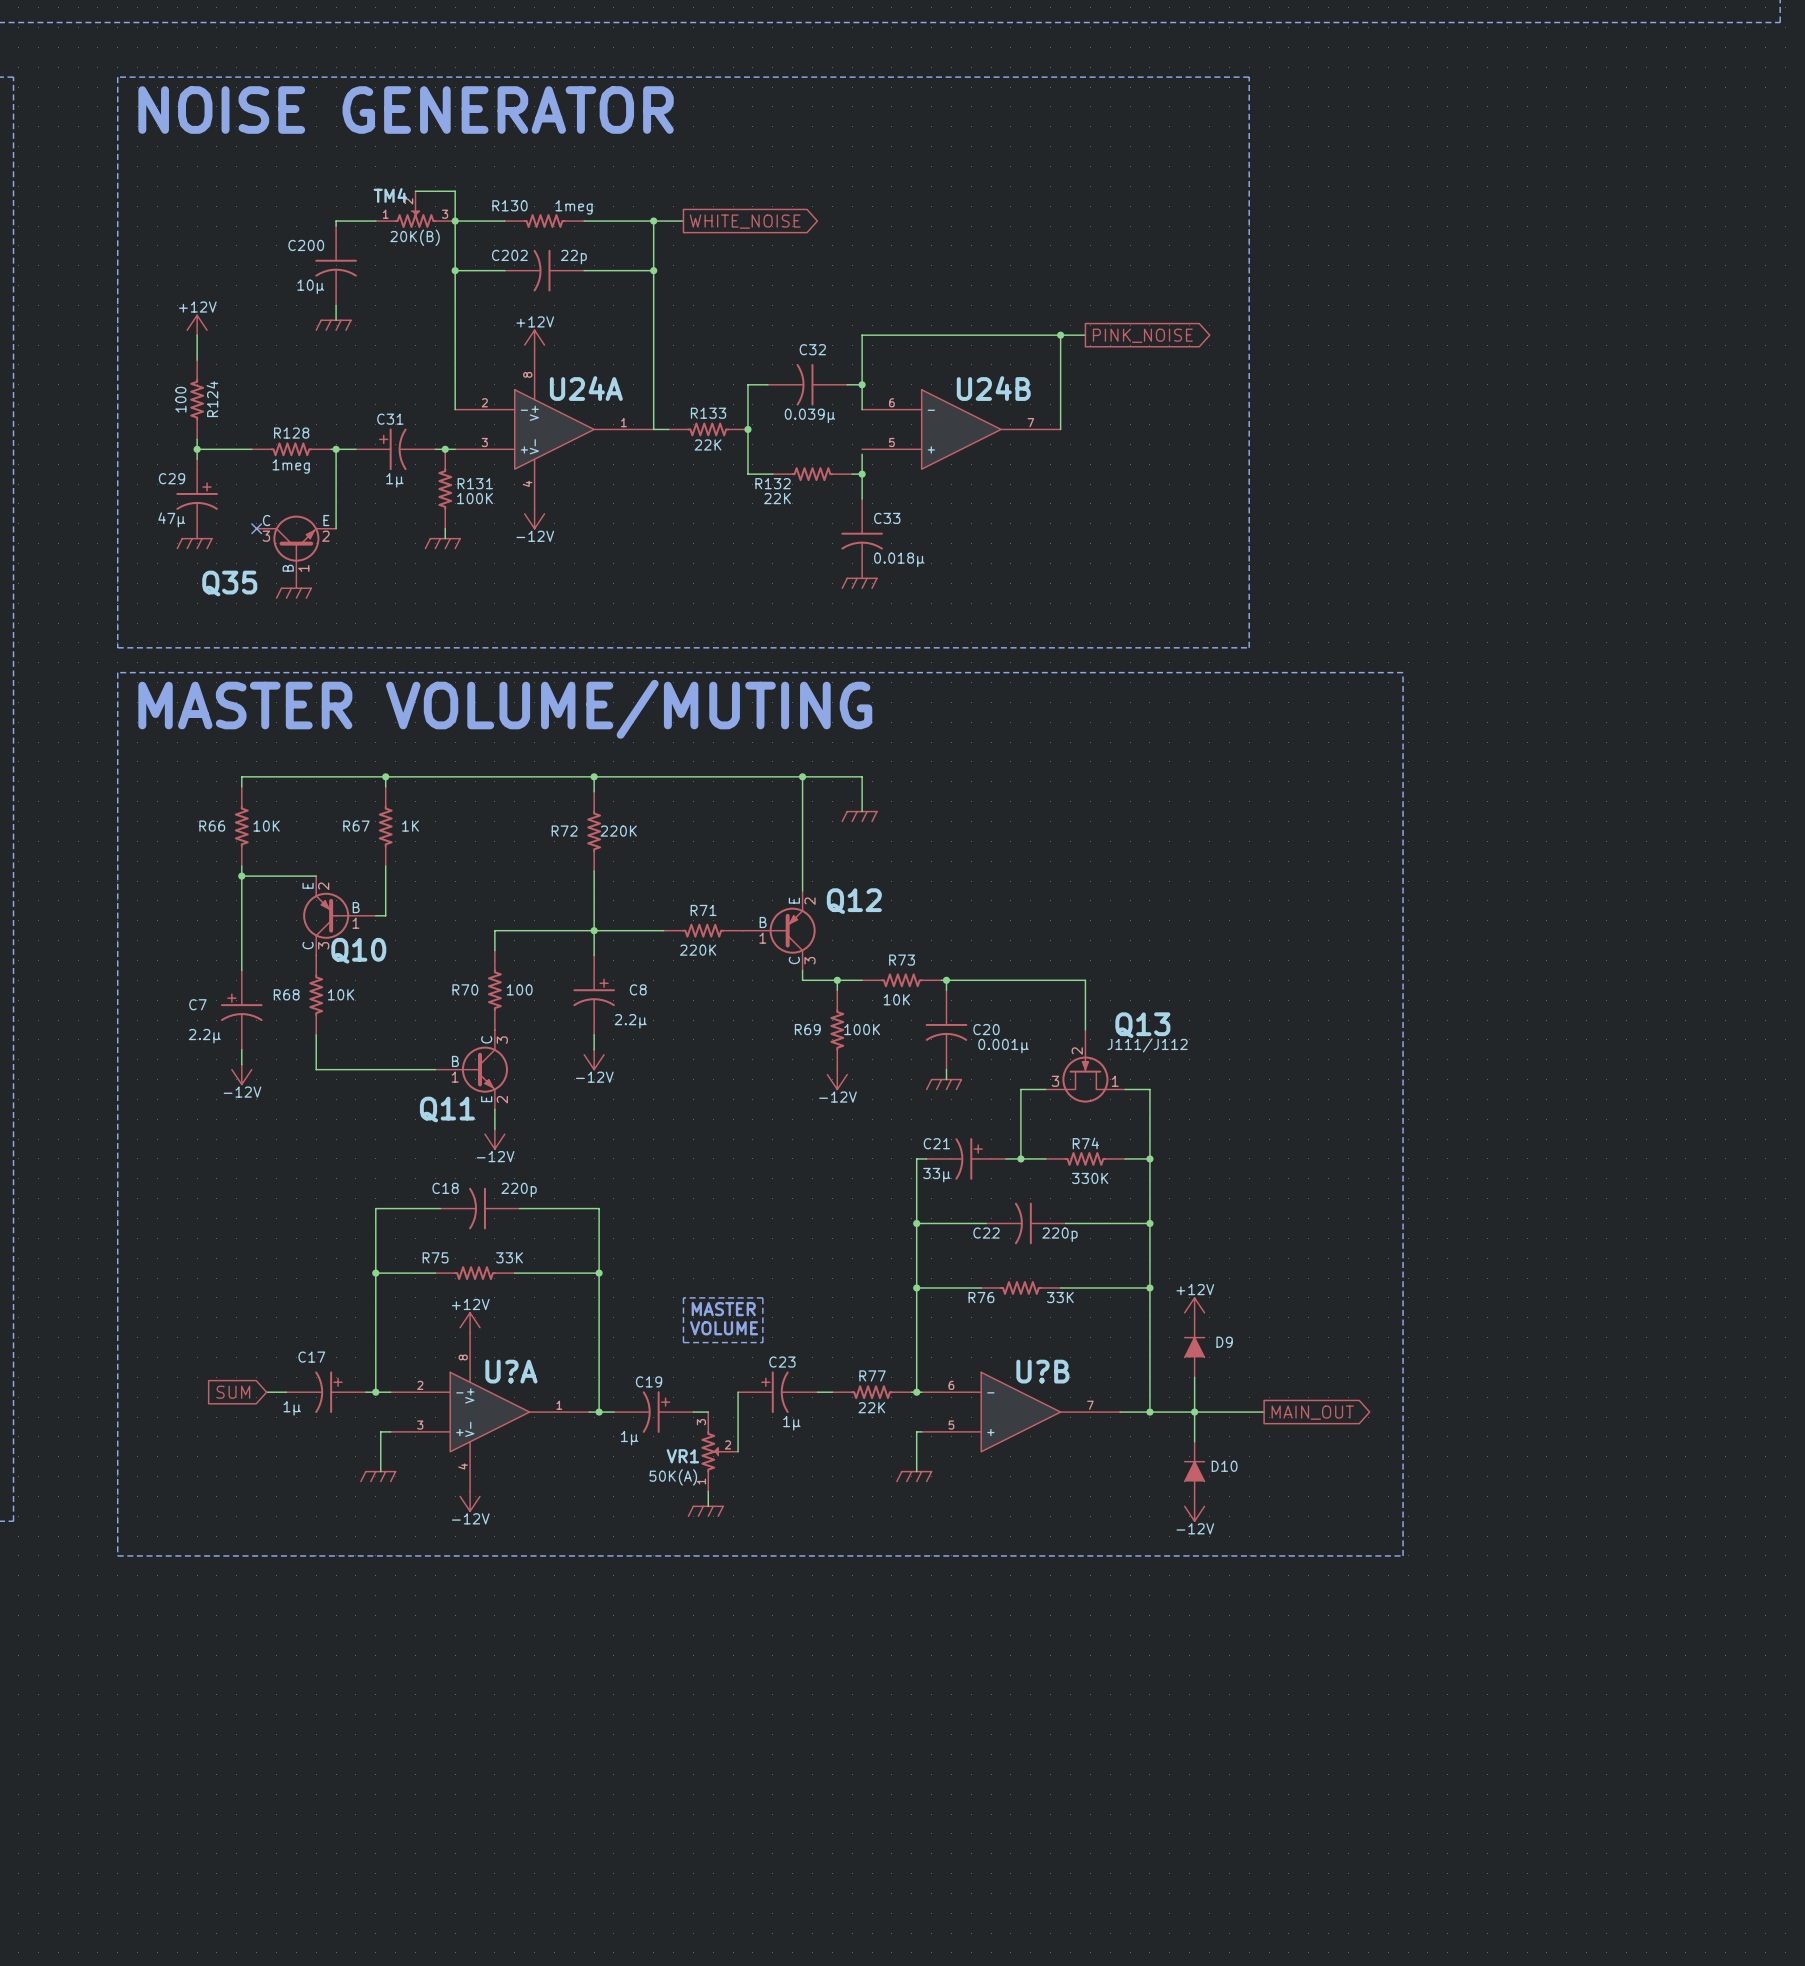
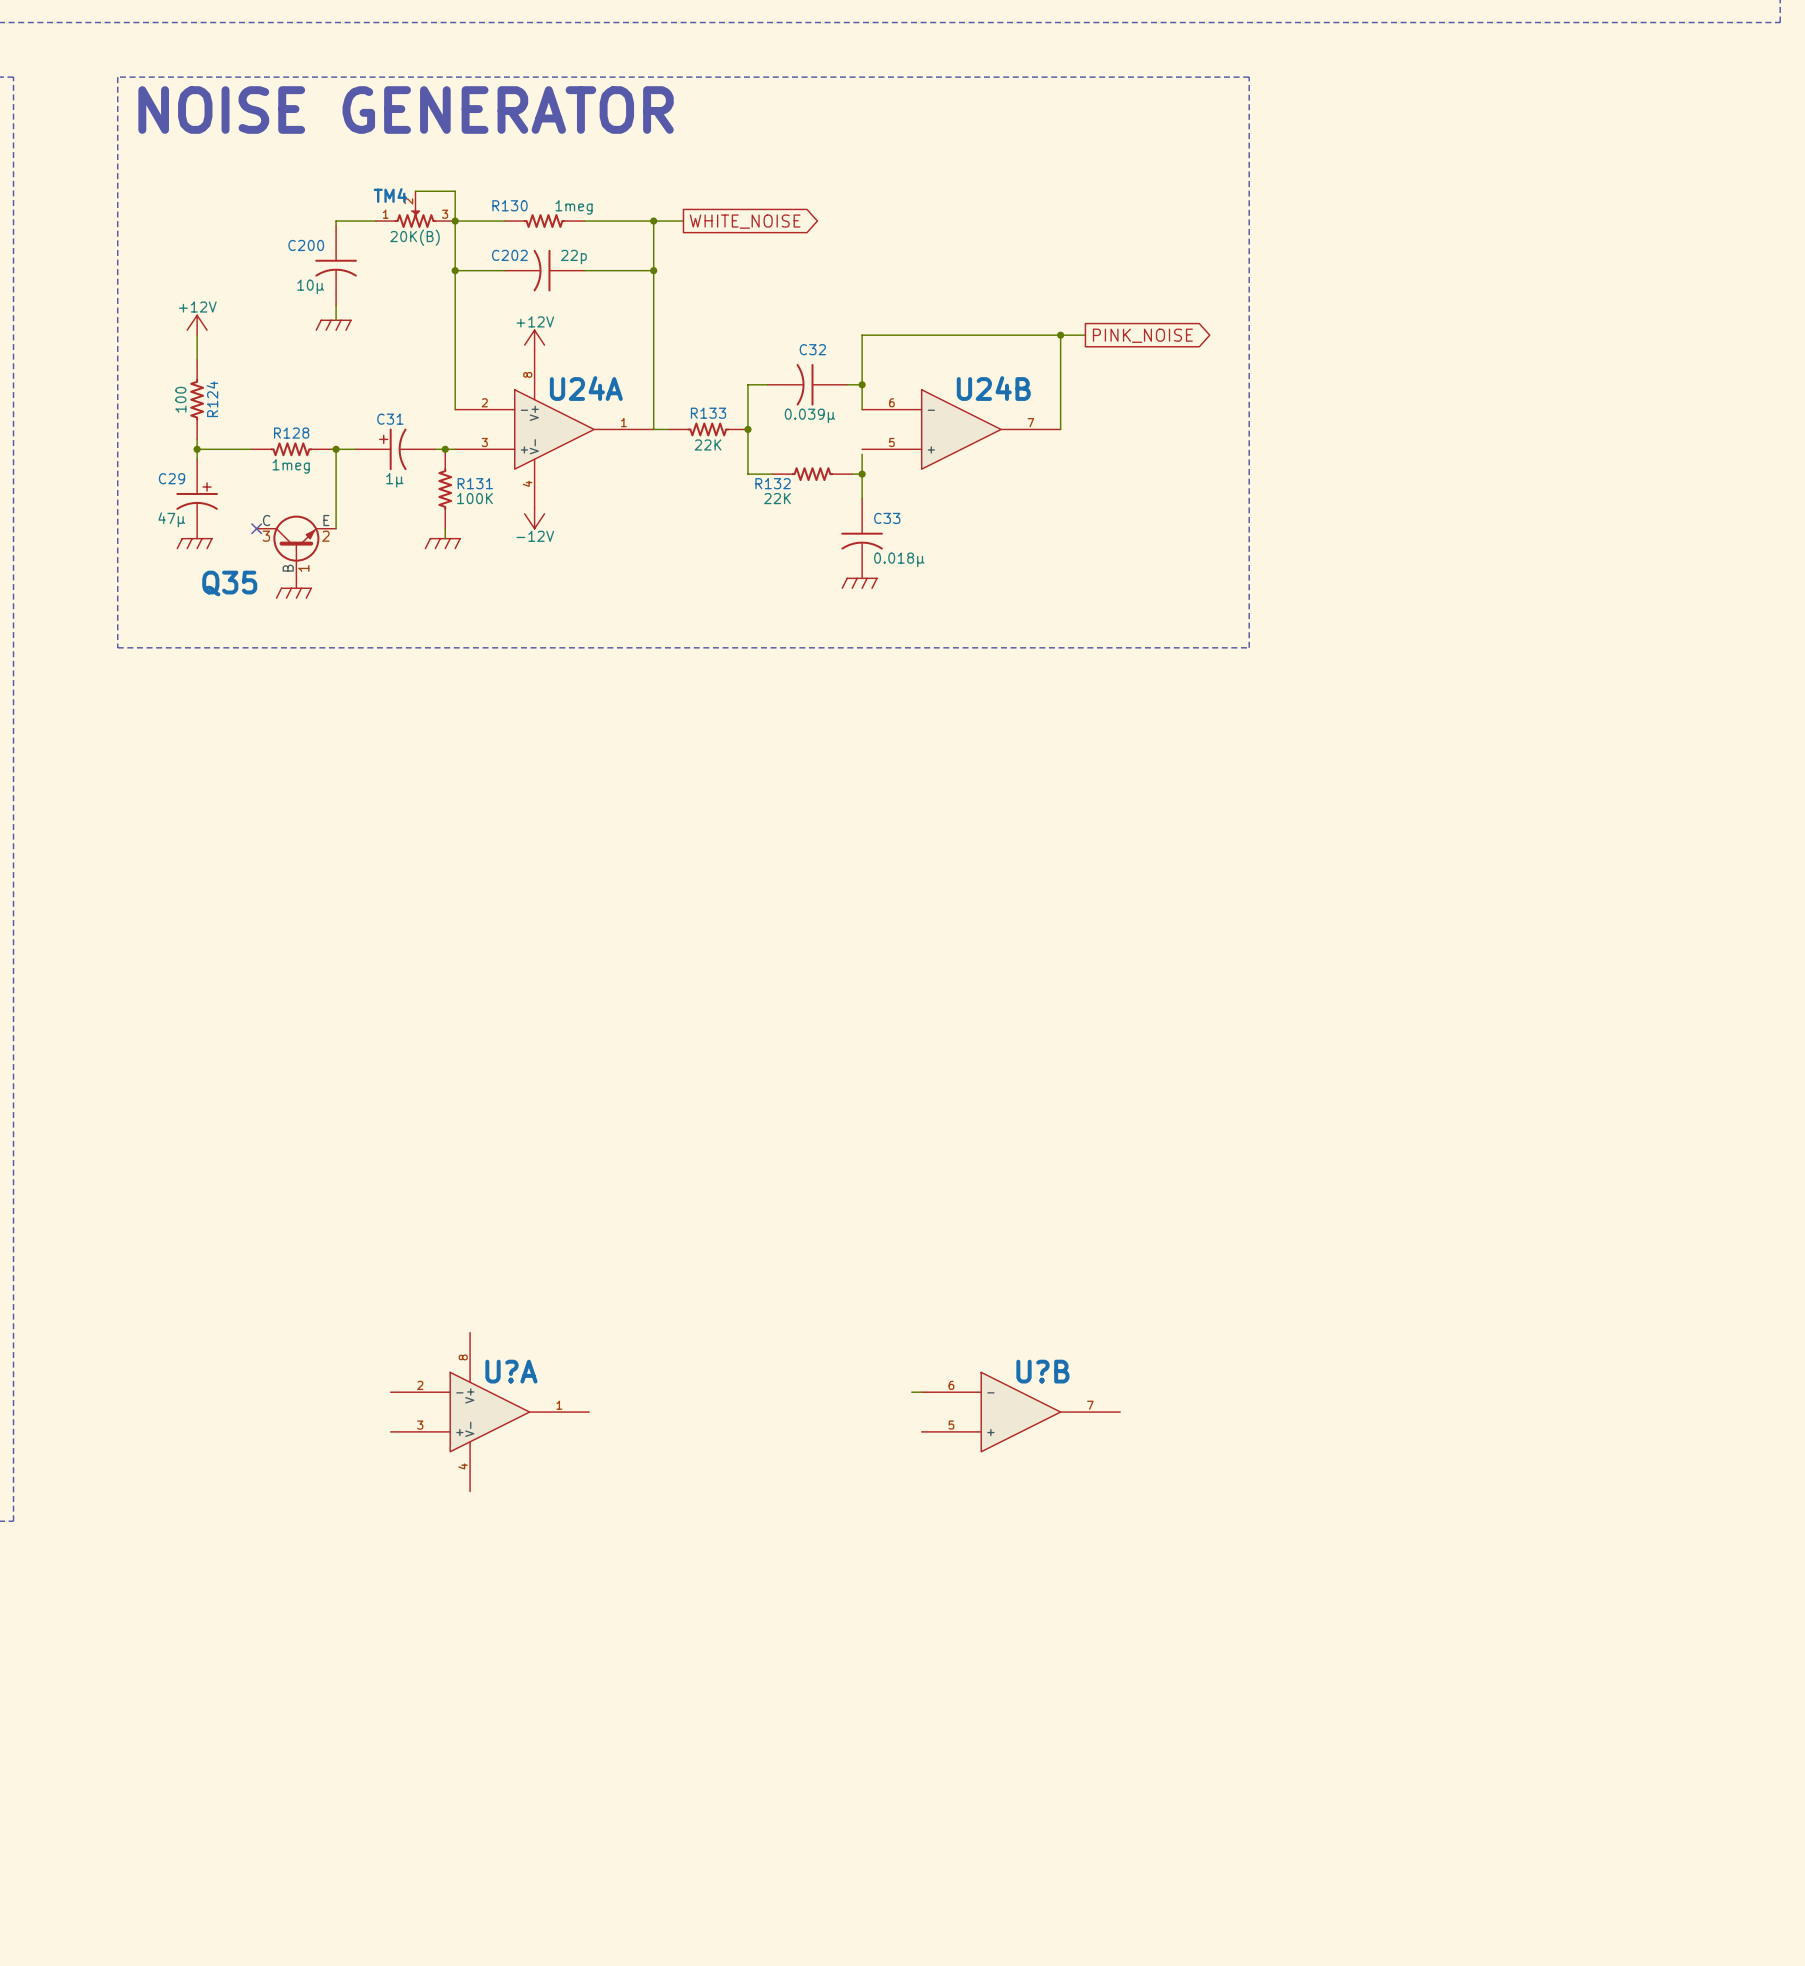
line: (117, 672) (117, 1555) (1403, 1555) (1403, 672) (117, 672) -> none
text: MASTER VOLUME/MUTING (505, 709) -> none
wire: (385, 776) (385, 786) -> none
junction: (385, 776) -> none
wire: (594, 776) (594, 791) -> none
junction: (594, 776) -> none
wire: (802, 776) (802, 890) -> none
junction: (802, 776) -> none
wire: (241, 786) (241, 776) (862, 776) (862, 811) -> none
power symbol: (859, 816) -> none
R66: 10K (241, 826) -> none
R67: 1K (385, 826) -> none
R72: 220K (594, 831) -> none
wire: (241, 866) (241, 970) -> none
wire: (385, 866) (385, 915) (375, 915) -> none
wire: (594, 871) (594, 955) -> none
wire: (241, 876) (316, 876) -> none
junction: (241, 876) -> none
Q10: (339, 915) -> none
junction: (594, 930) -> none
wire: (663, 930) (494, 930) (494, 950) -> none
R71: 220K (703, 930) -> none
Q12: (779, 930) -> none
wire: (802, 970) (802, 980) (862, 980) -> none
wire: (837, 980) (837, 990) -> none
junction: (837, 980) -> none
R73: 10K (901, 980) -> none
wire: (941, 980) (1085, 980) (1085, 1029) -> none
wire: (946, 980) (946, 990) -> none
junction: (946, 980) -> none
R70: 100 (494, 990) -> none
R68: 10K (316, 995) -> none
C8: 2.2μ (594, 995) -> none
C7: 2.2μ (241, 1010) -> none
R69: 100K (837, 1029) -> none
C20: 0.001μ (946, 1029) -> none
wire: (316, 1034) (316, 1069) (435, 1069) -> none
wire: (594, 1034) (594, 1049) -> none
wire: (241, 1049) (241, 1064) -> none
power symbol: -12V (594, 1059) -> none
Q13: J111/J112 (1085, 1066) -> none
Q11: (471, 1069) -> none
wire: (946, 1069) (946, 1079) -> none
power symbol: -12V (241, 1074) -> none
power symbol: -12V (837, 1079) -> none
power symbol: (944, 1084) -> none
wire: (1045, 1089) (1020, 1089) (1020, 1158) -> none
wire: (1125, 1089) (1149, 1089) (1149, 1412) -> none
wire: (494, 1109) (494, 1129) -> none
power symbol: -12V (494, 1139) -> none
wire: (926, 1158) (916, 1158) (916, 1392) -> none
C21: 33μ (966, 1158) -> none
wire: (1006, 1158) (1045, 1158) -> none
junction: (1020, 1158) -> none
R74: 330K (1085, 1158) -> none
wire: (1125, 1158) (1149, 1158) -> none
junction: (1149, 1158) -> none
wire: (440, 1208) (375, 1208) (375, 1392) -> none
C18: 220p (480, 1208) -> none
wire: (519, 1208) (599, 1208) (599, 1412) -> none
wire: (916, 1223) (986, 1223) -> none
junction: (916, 1223) -> none
C22: 220p (1025, 1223) -> none
wire: (1065, 1223) (1149, 1223) -> none
junction: (1149, 1223) -> none
wire: (375, 1273) (435, 1273) -> none
junction: (375, 1273) -> none
R75: 33K (475, 1273) -> none
wire: (514, 1273) (599, 1273) -> none
junction: (599, 1273) -> none
wire: (916, 1287) (981, 1287) -> none
junction: (916, 1287) -> none
R76: 33K (1020, 1287) -> none
wire: (1060, 1287) (1149, 1287) -> none
junction: (1149, 1287) -> none
line: (683, 1297) (683, 1342) (762, 1342) (762, 1297) (683, 1297) -> none
power symbol: +12V (1194, 1307) -> none
text: MASTER (723, 1309) -> none
power symbol: +12V (470, 1322) -> none
text: VOLUME (724, 1328) -> none
D9: (1194, 1347) -> none
wire: (1194, 1377) (1194, 1441) -> none
global label: SUM (233, 1392) -> none
wire: (266, 1392) (286, 1392) -> none
C17: 1μ (326, 1392) -> none
wire: (365, 1392) (390, 1392) -> none
junction: (375, 1392) -> none
wire: (738, 1392) (738, 1451) -> none
C23: 1μ (777, 1392) -> none
wire: (817, 1392) (832, 1392) -> none
R77: 22K (872, 1392) -> none
junction: (916, 1392) -> none
wire: (589, 1412) (613, 1412) -> none
junction: (599, 1412) -> none
C19: 1μ (653, 1412) -> none
wire: (693, 1412) (708, 1412) -> none
wire: (1120, 1412) (1264, 1412) -> none
junction: (1149, 1412) -> none
junction: (1194, 1412) -> none
global label: MAIN_OUT (1312, 1412) -> none
wire: (390, 1431) (380, 1431) (380, 1471) -> none
wire: (921, 1431) (916, 1431) (916, 1471) -> none
VR1: 50K(A) (719, 1451) -> none
D10: (1194, 1471) -> none
power symbol: (378, 1476) -> none
power symbol: (914, 1476) -> none
wire: (708, 1491) (708, 1506) -> none
power symbol: -12V (470, 1501) -> none
power symbol: (705, 1511) -> none
power symbol: -12V (1194, 1511) -> none

